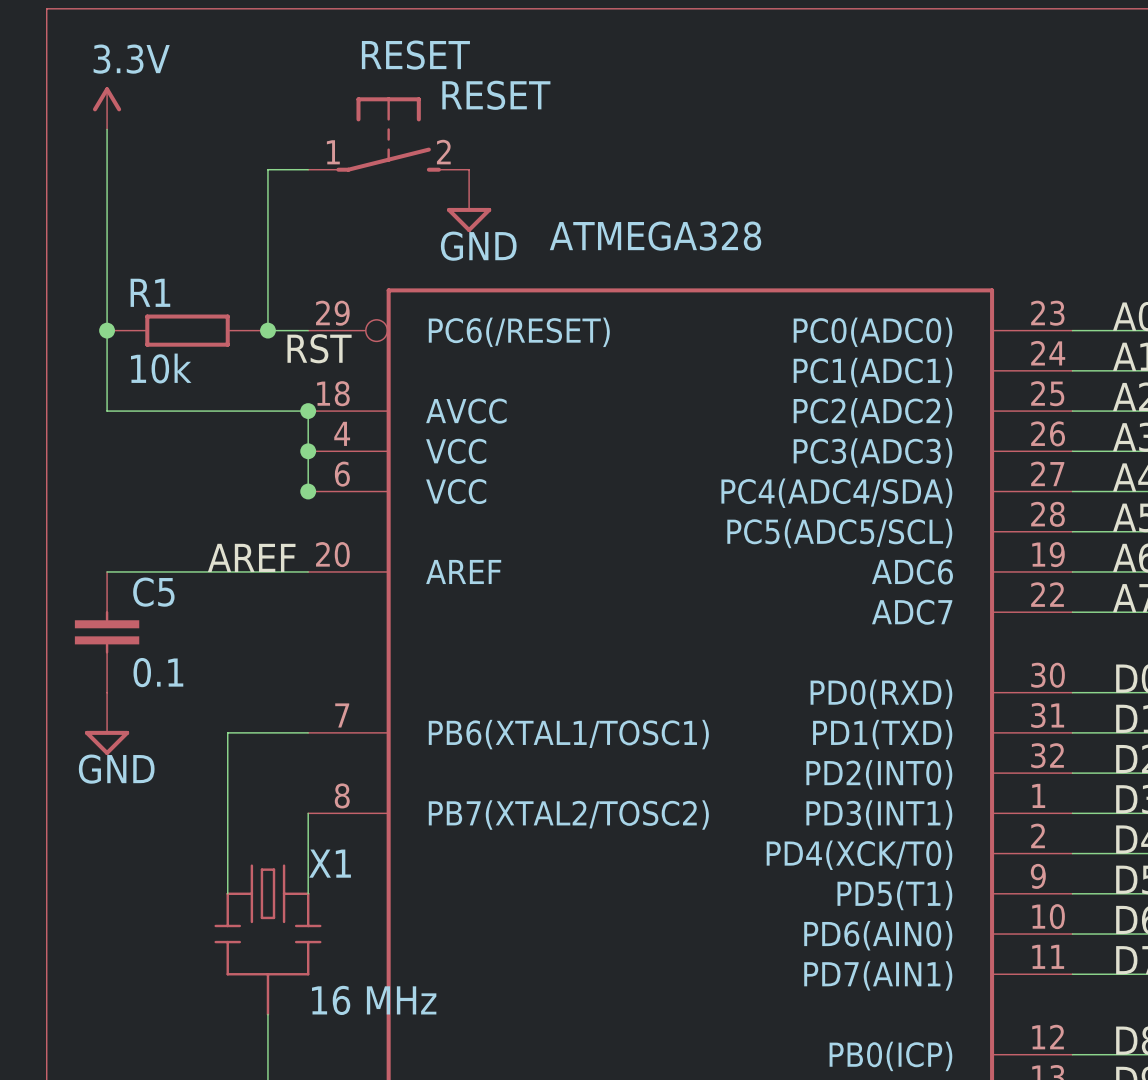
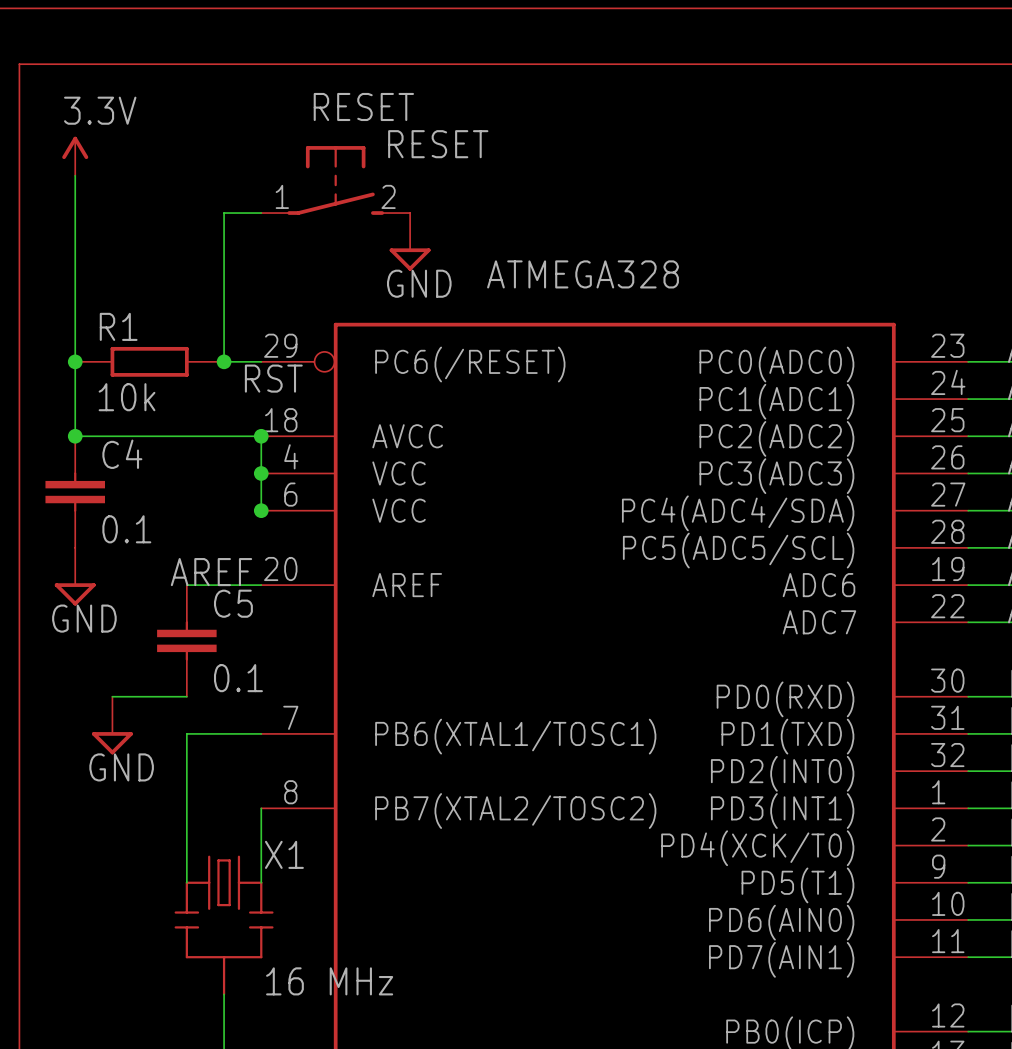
junction: none -> (75, 436)
C4: none -> 0.1 (75, 492)
power symbol: none -> GND (75, 576)
wire: (107, 571) (227, 571) -> none
C5 position: (107, 632) -> (186, 640)
wire: none -> (112, 696) (186, 696)
power symbol position: GND (107, 723) -> GND (112, 725)

